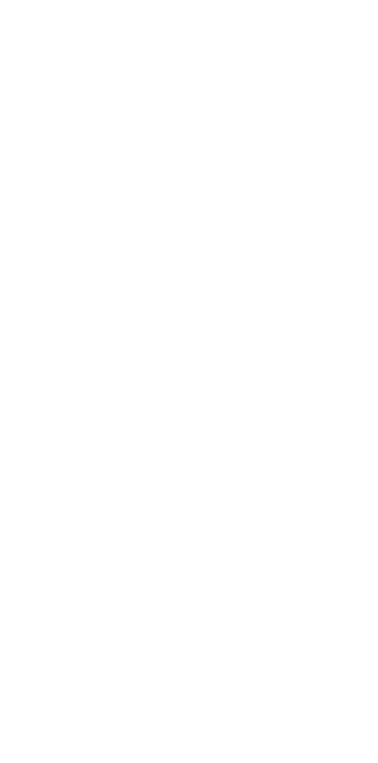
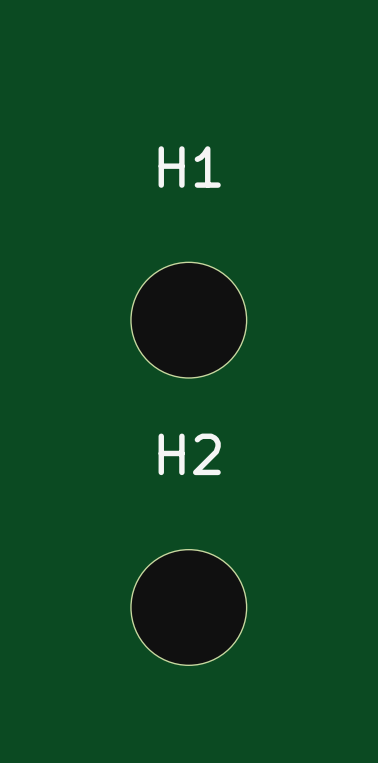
H1: none -> (188, 320)
H2: none -> (188, 607)

